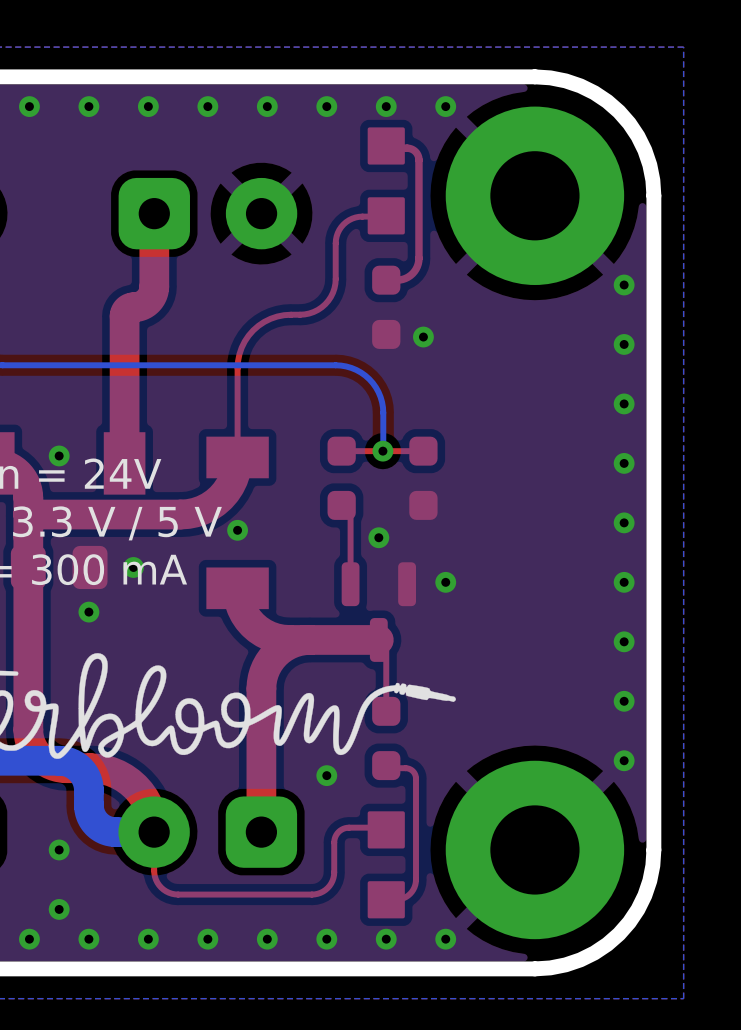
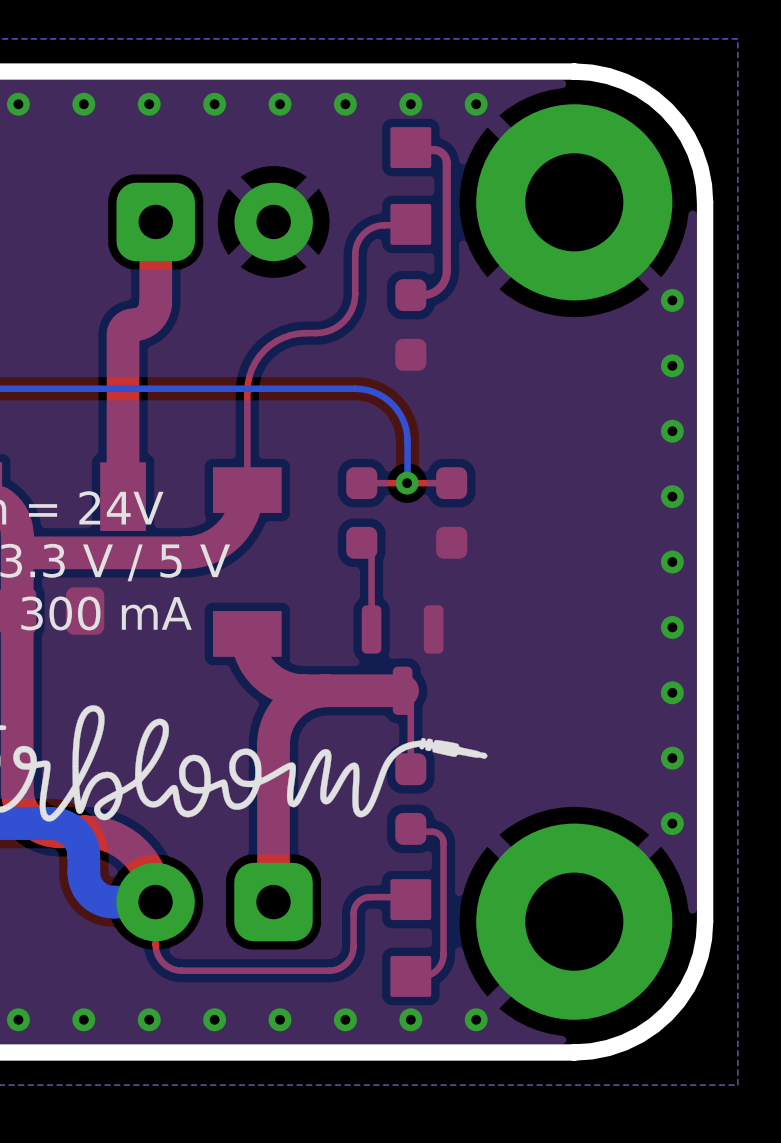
via: (423, 337) -> none
via: (59, 455) -> none
via: (237, 530) -> none
via: (378, 537) -> none
via: (133, 567) -> none
via: (445, 582) -> none
via: (88, 612) -> none
via: (326, 775) -> none
via: (59, 849) -> none
via: (59, 909) -> none

